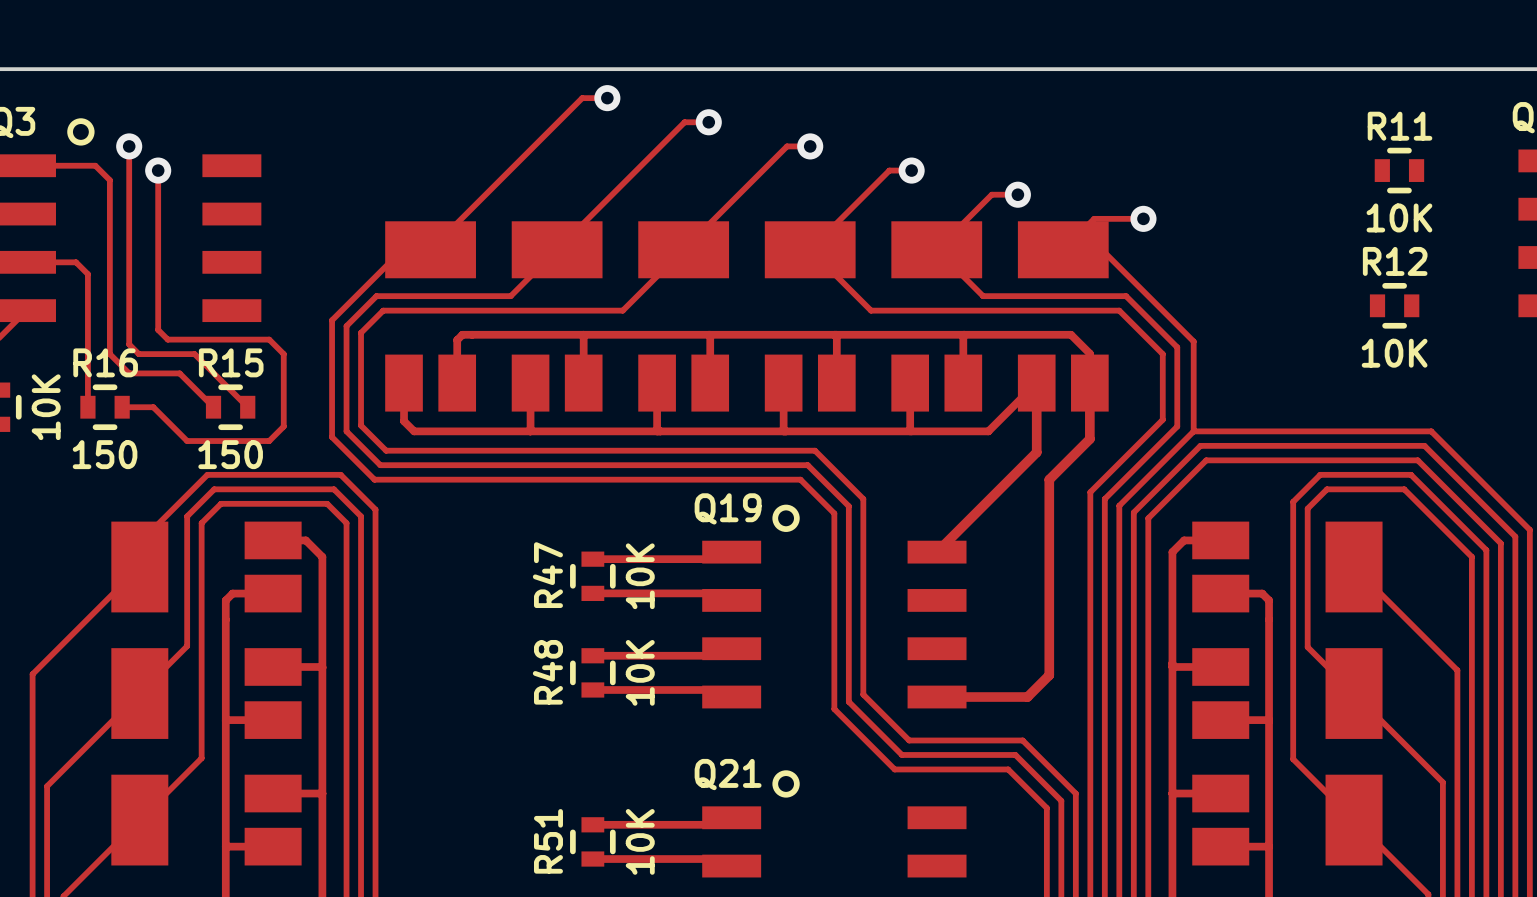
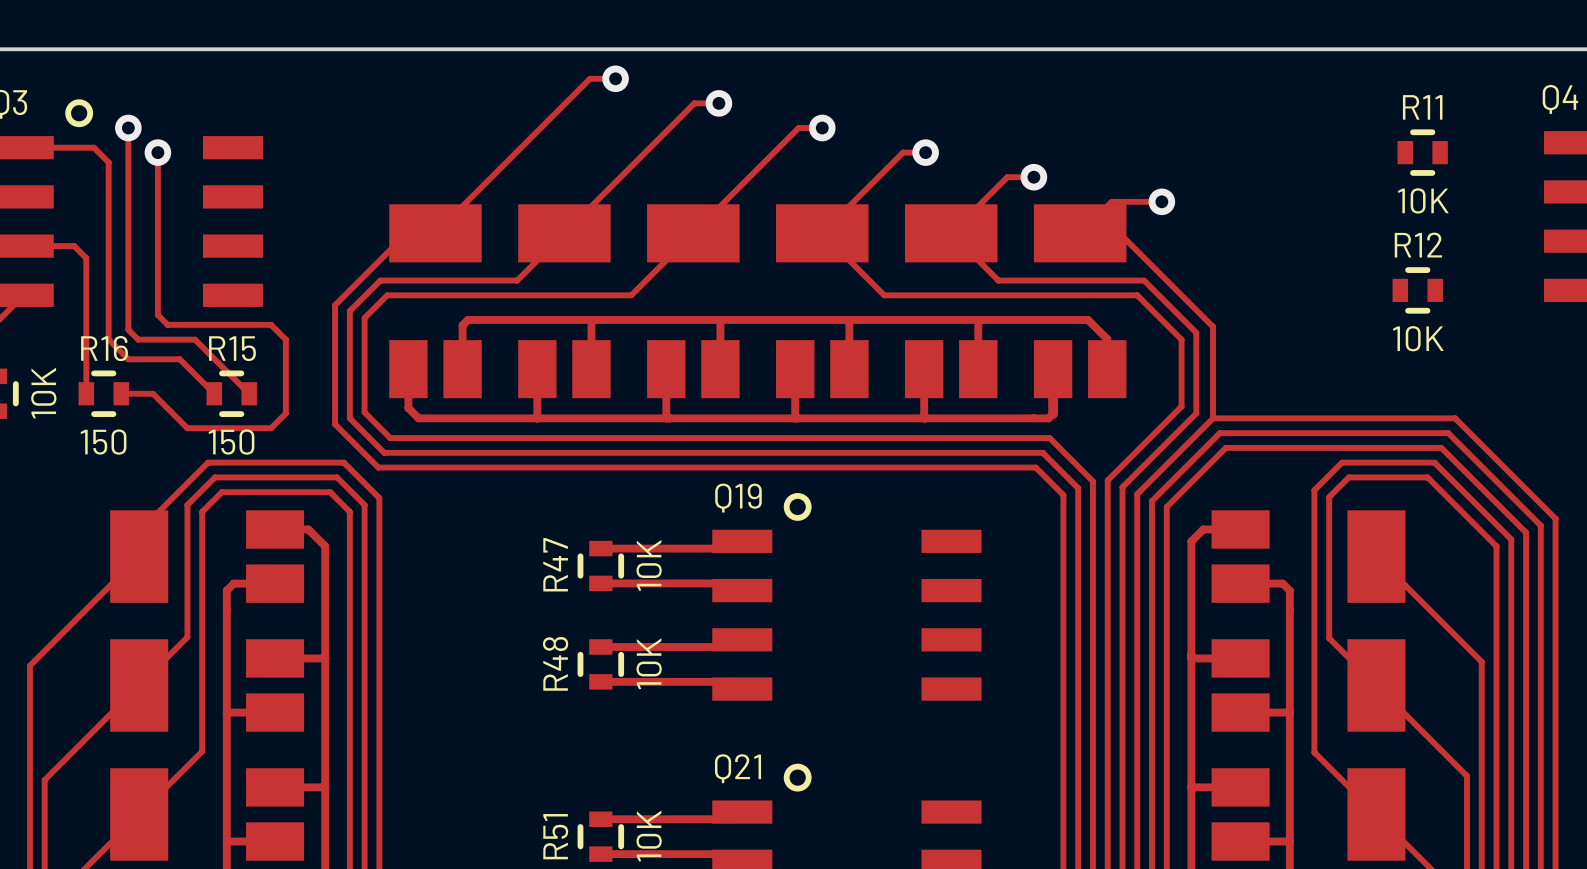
track: (1036, 383) (988, 431) -> (1053, 413) (1048, 418) (1003, 418)
track: (1089, 383) (1089, 439) (1049, 479) (1049, 675) (1027, 697) (937, 697) -> none
track: (1036, 427) (1036, 452) (937, 552) -> none
track: (815, 450) (863, 499) (863, 694) (909, 740) (1022, 740) (1075, 793) -> (827, 438) (1049, 438) (1092, 481) (1092, 787)
track: (807, 465) (848, 506) (848, 701) (901, 754) (1015, 754) (1061, 800) -> (819, 452) (1042, 452) (1078, 488) (1078, 794)
track: (800, 479) (834, 513) (834, 709) (894, 769) (1008, 769) (1046, 808) -> (812, 467) (1035, 467) (1063, 495) (1063, 802)

